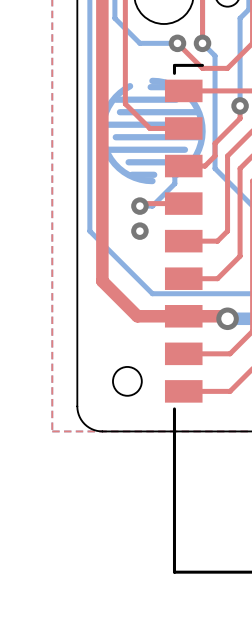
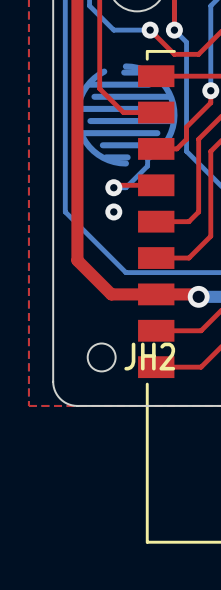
JH2 name: none -> JH2 (149, 356)

